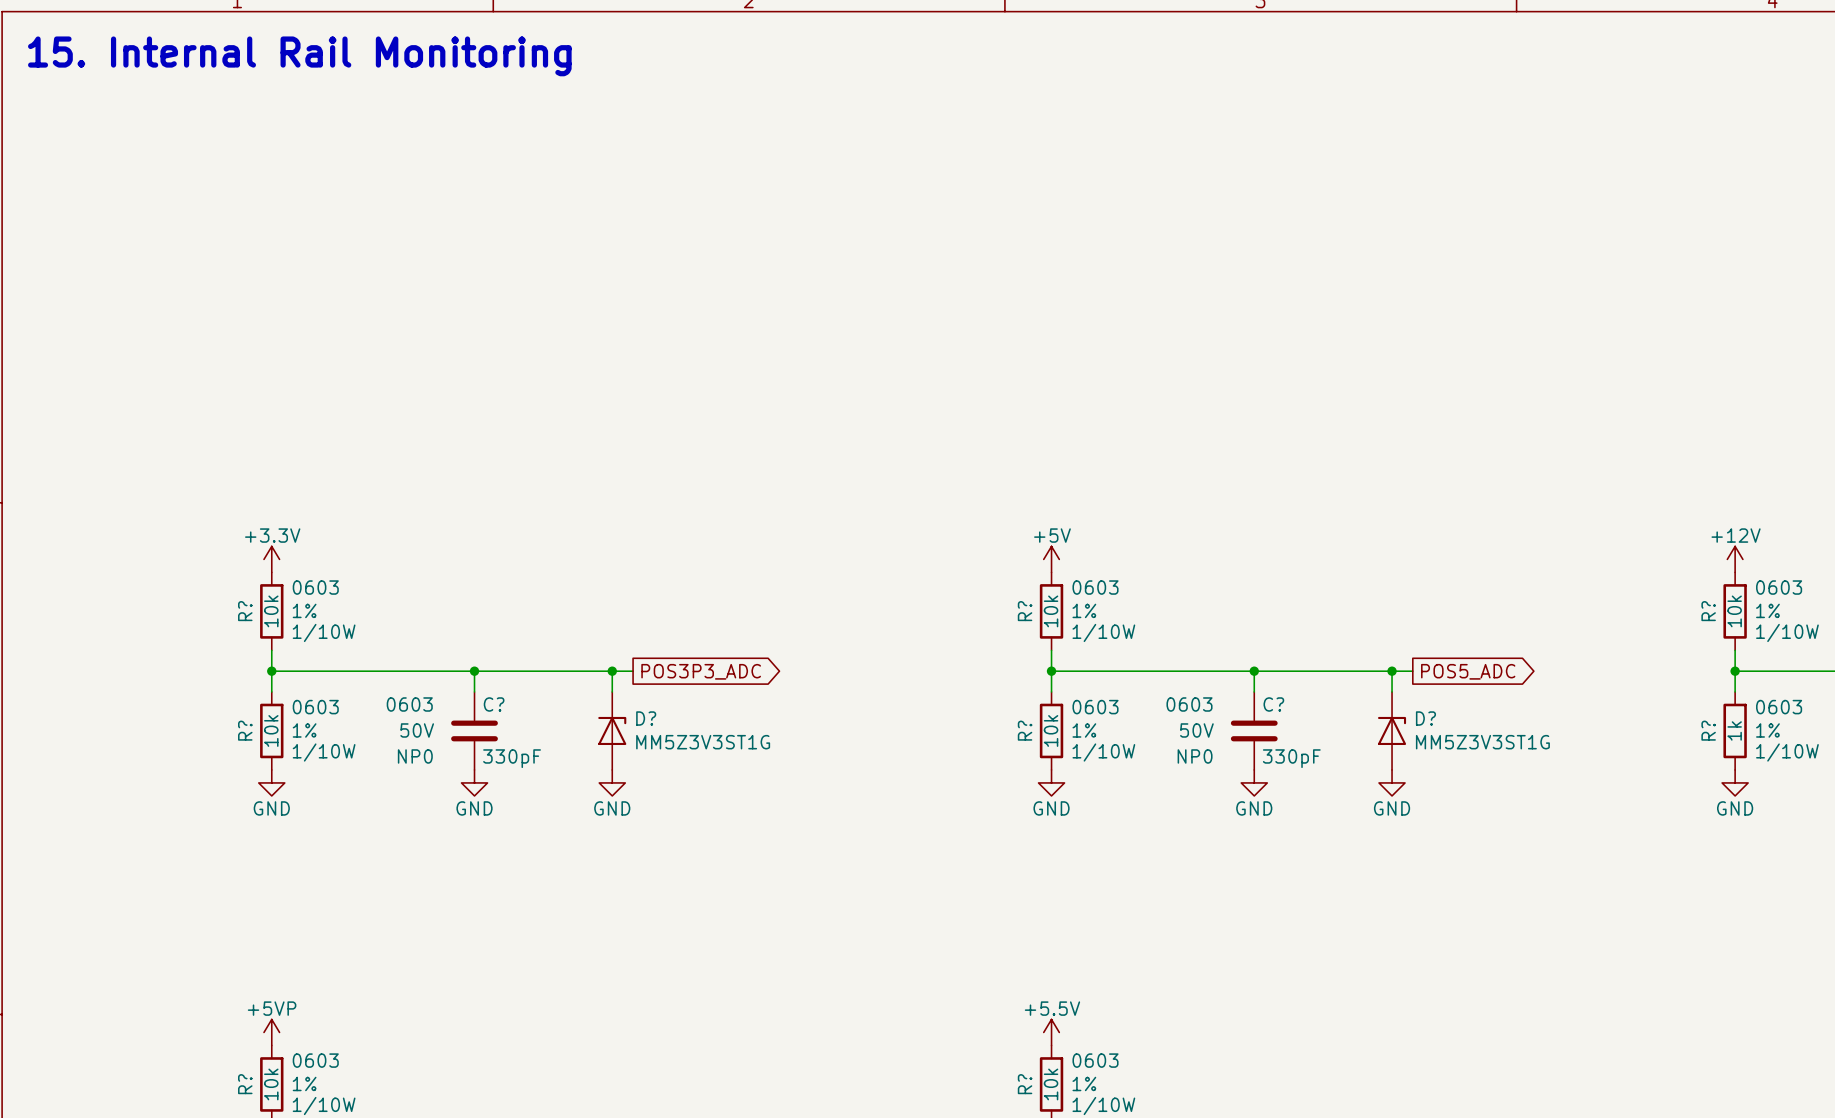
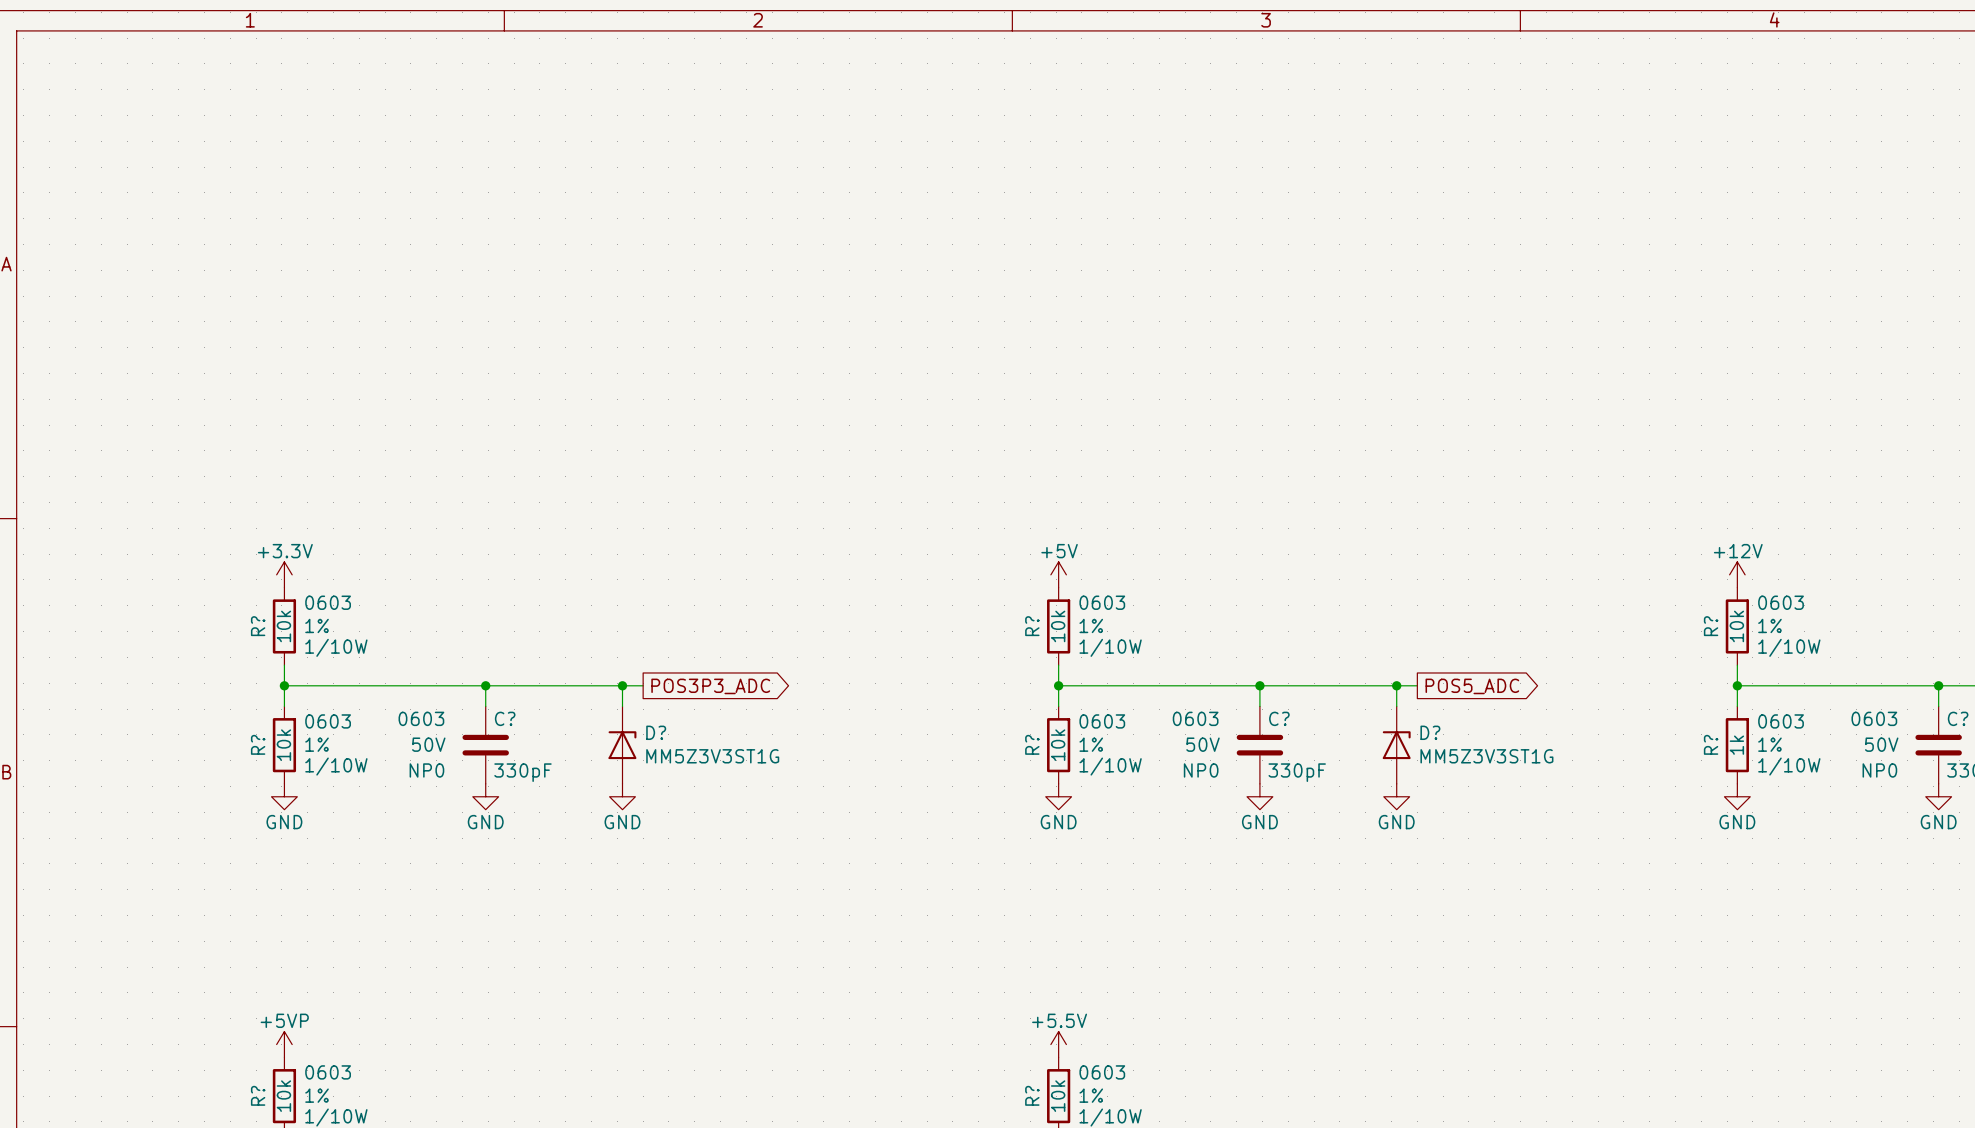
text: 15. Internal Rail Monitoring (299, 56) -> none

